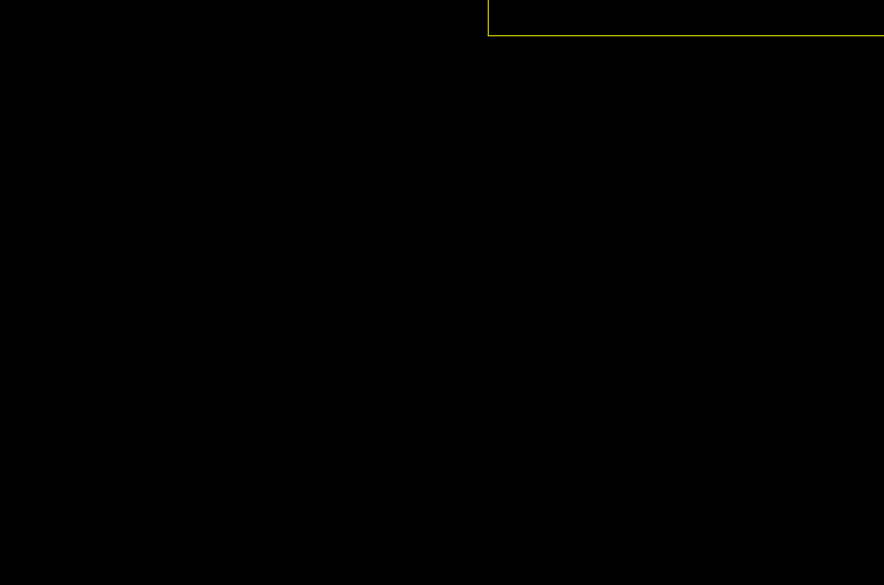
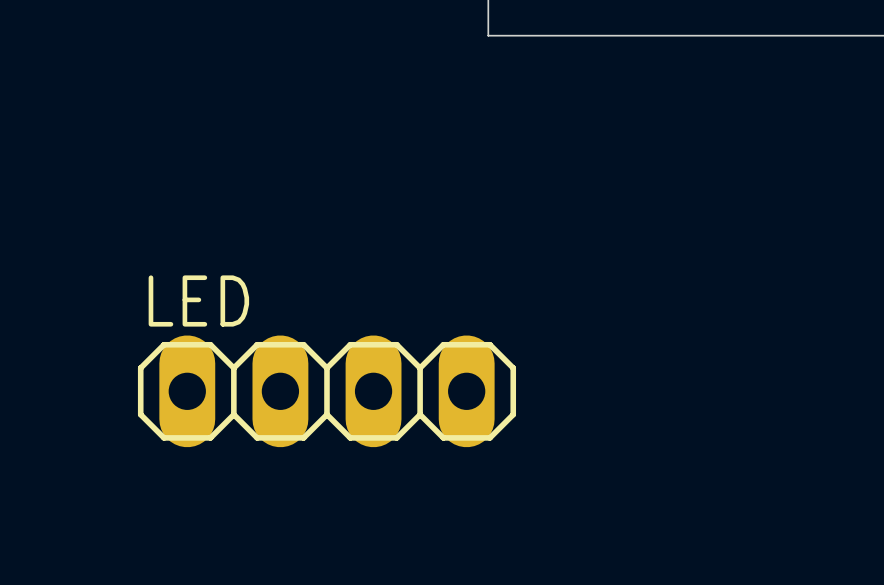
LED: none -> (326, 391)

